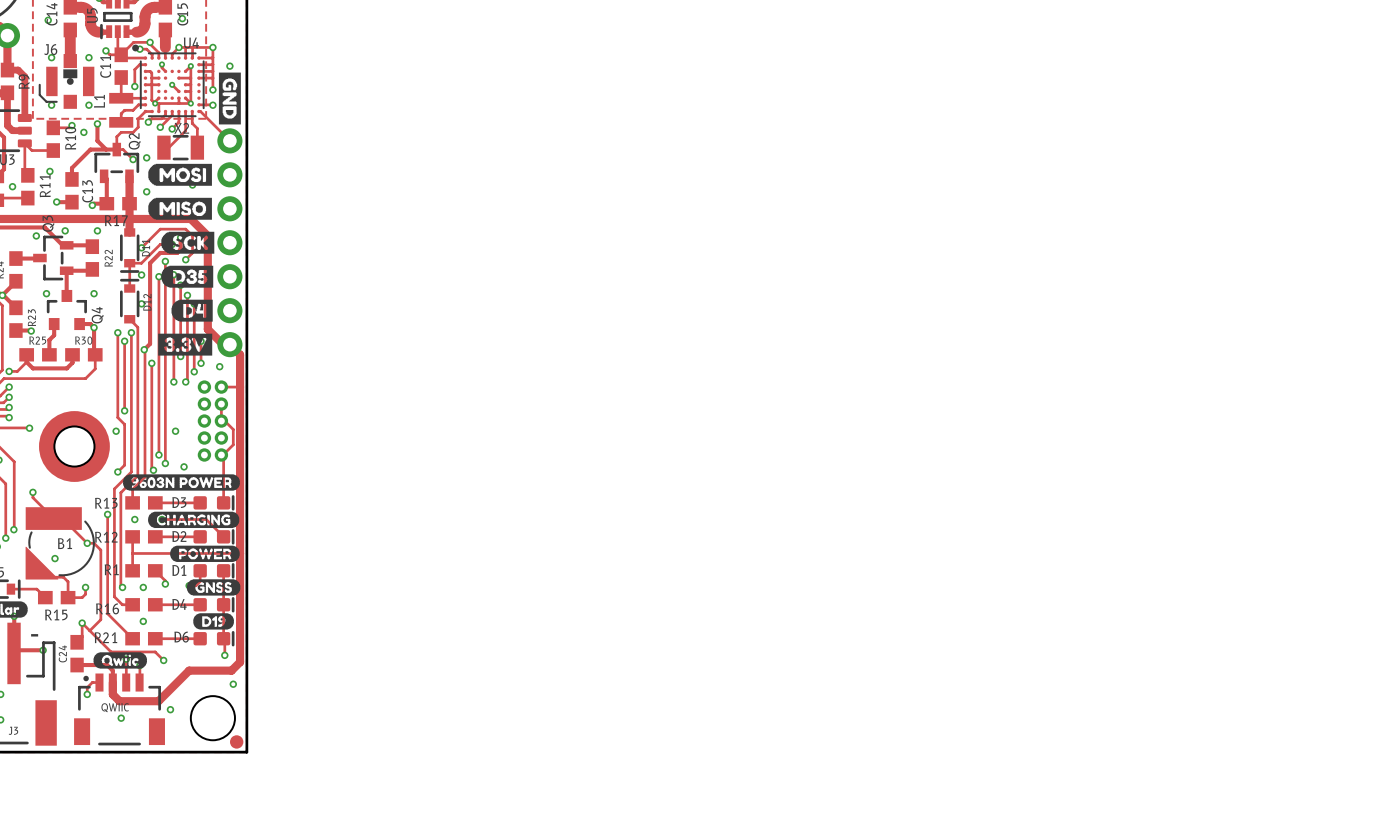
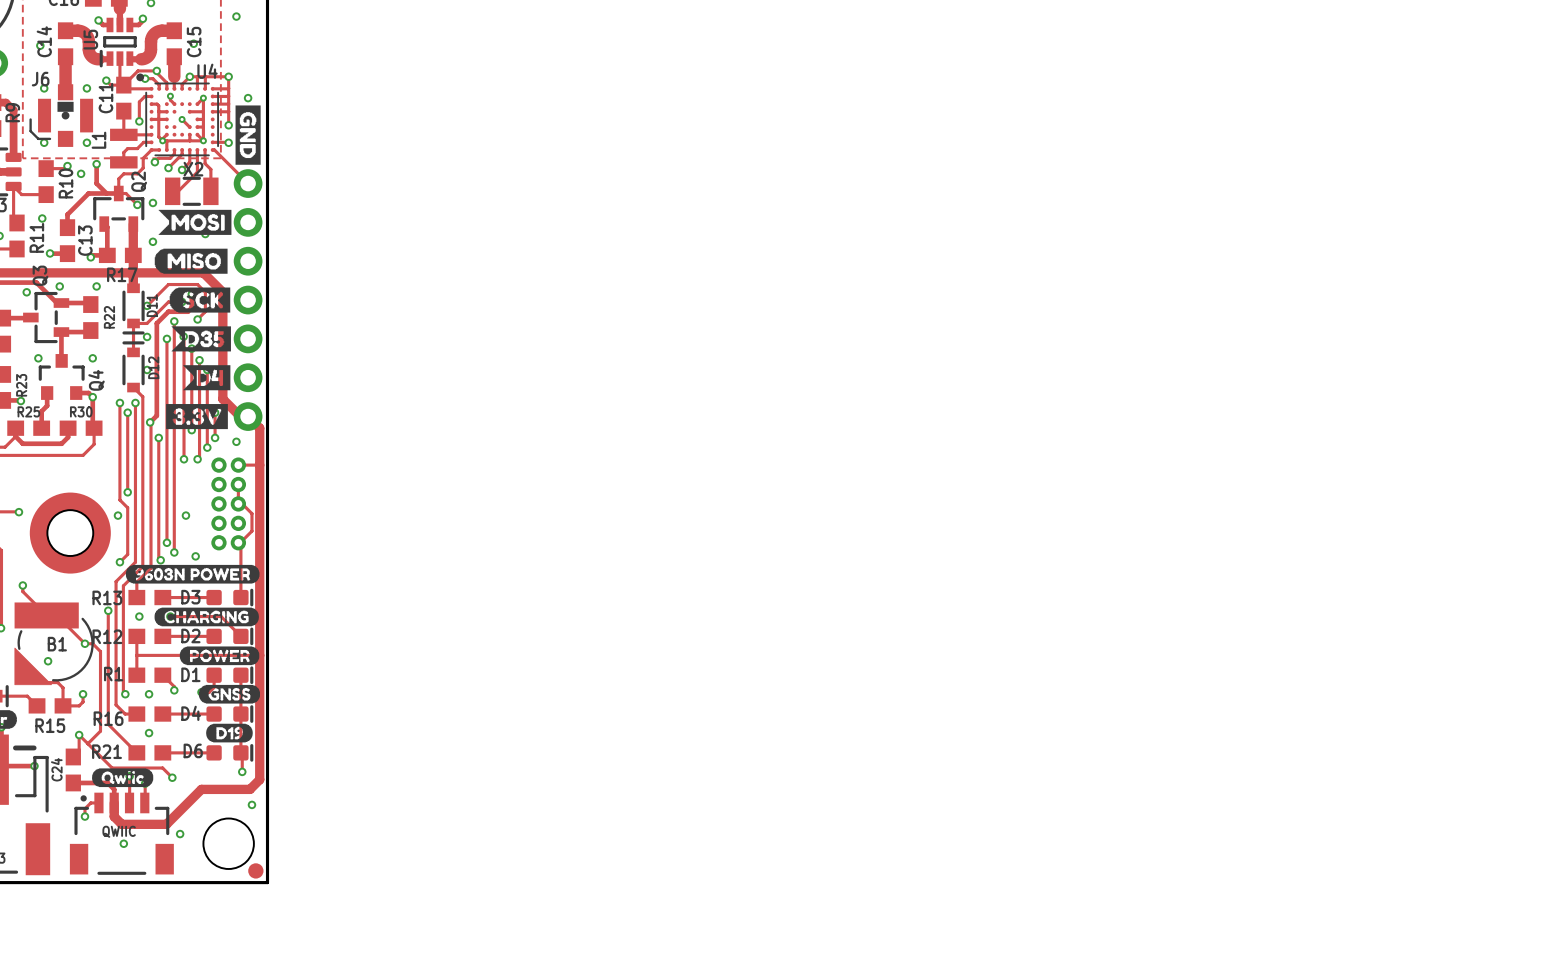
drawing shape: [148, 163, 212, 186] -> [158, 209, 232, 235]
drawing shape: [161, 265, 214, 288] -> [171, 326, 231, 352]
drawing shape: [171, 299, 213, 322] -> [183, 365, 231, 391]

